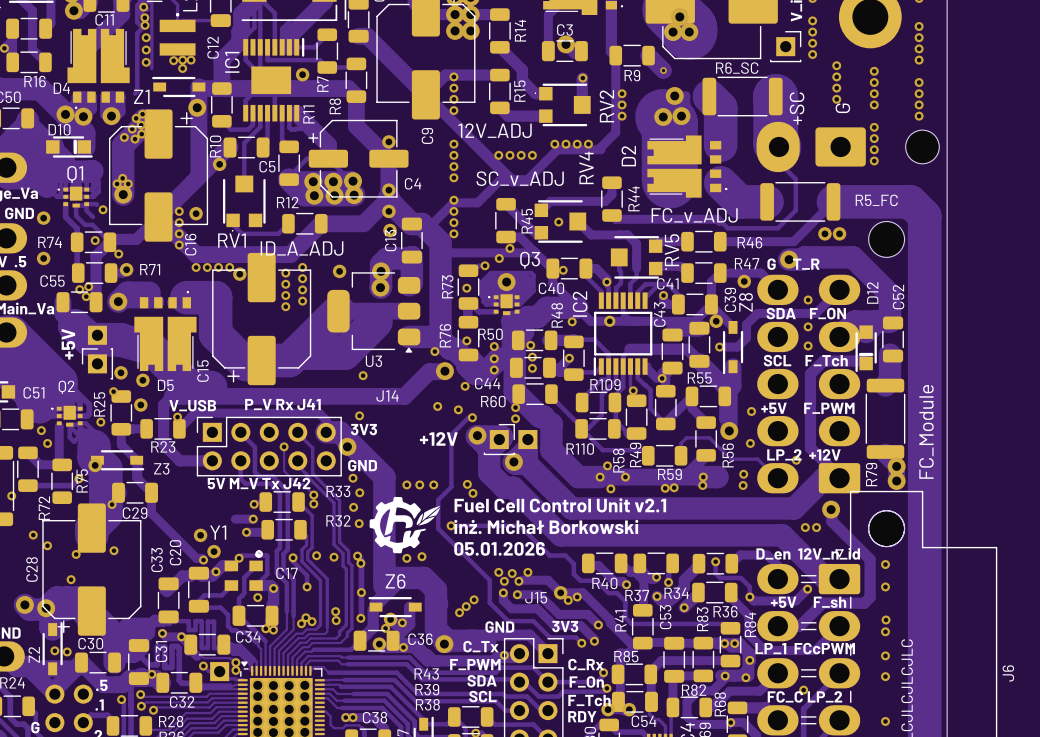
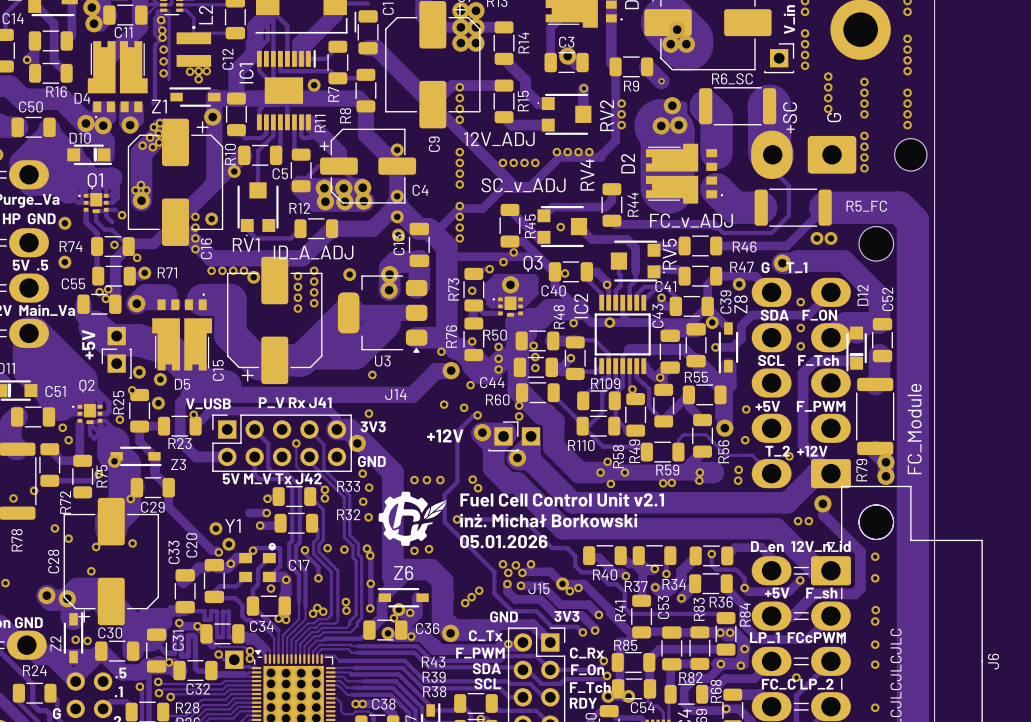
text: G T_R (793, 264) -> G T_1 (784, 267)
text: LP_2 +12V (803, 454) -> T_2 +12V (796, 451)

